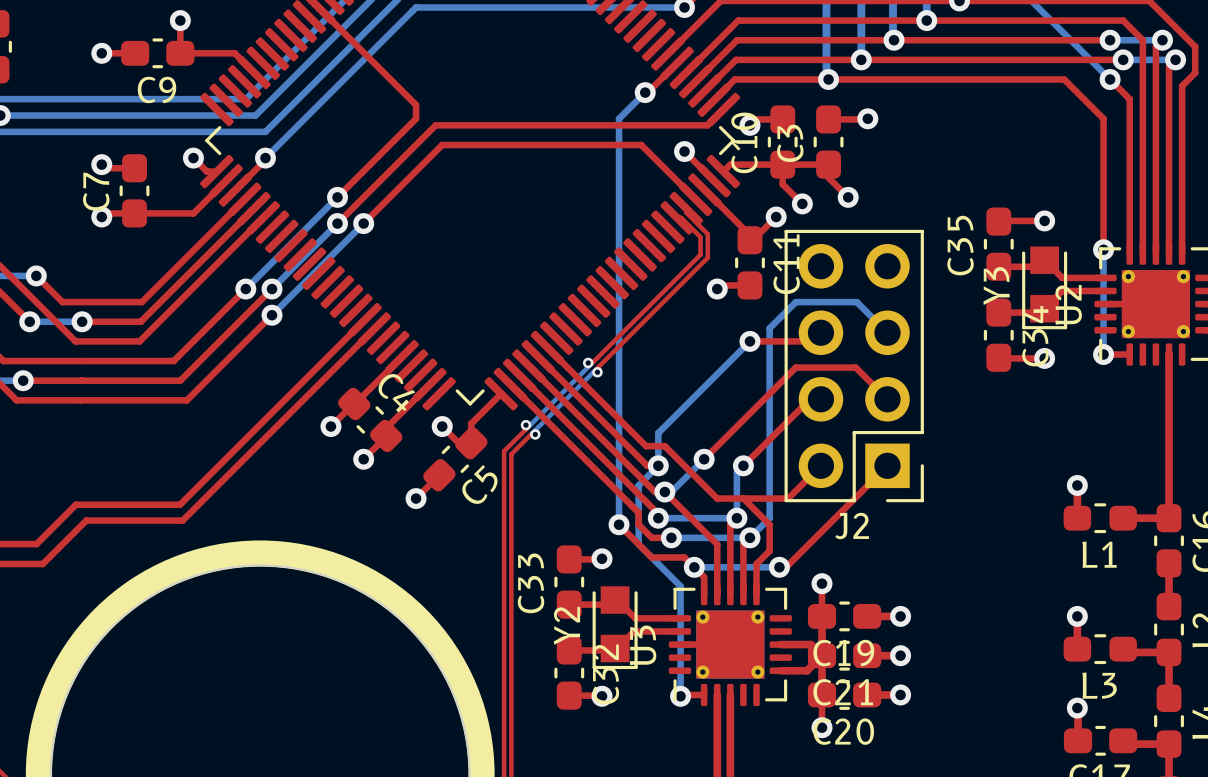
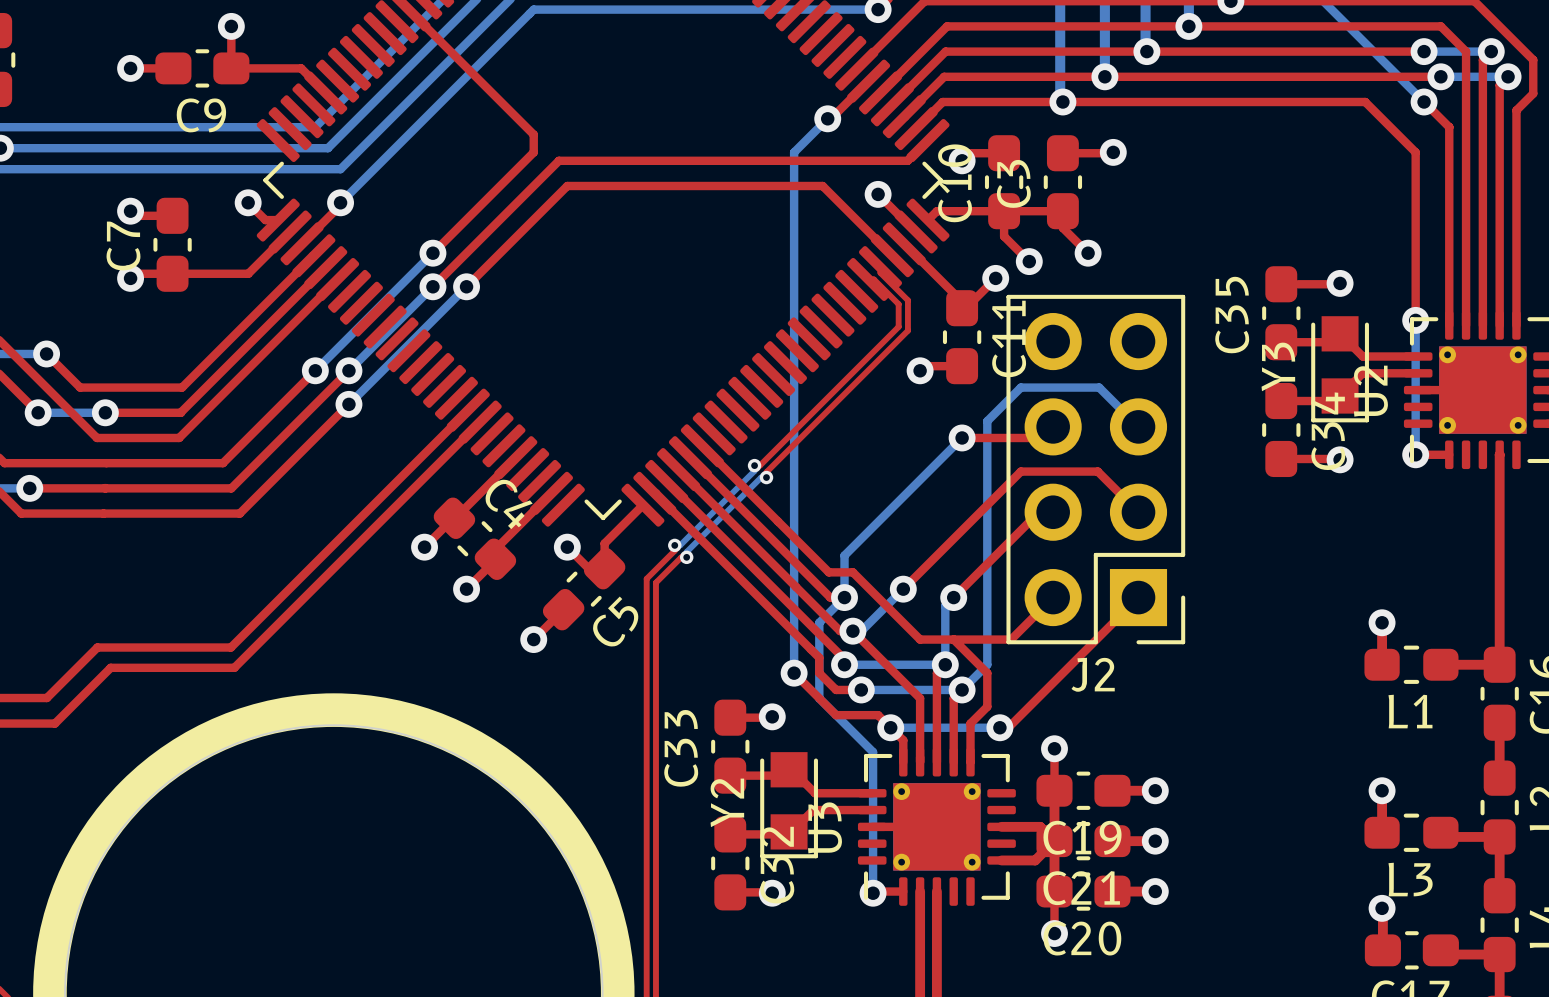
top track: (1044, 220) (998, 221) -> (1339, 284) (1298, 284)
top track: (998, 357) (1044, 358) -> (1298, 458) (1339, 458)

